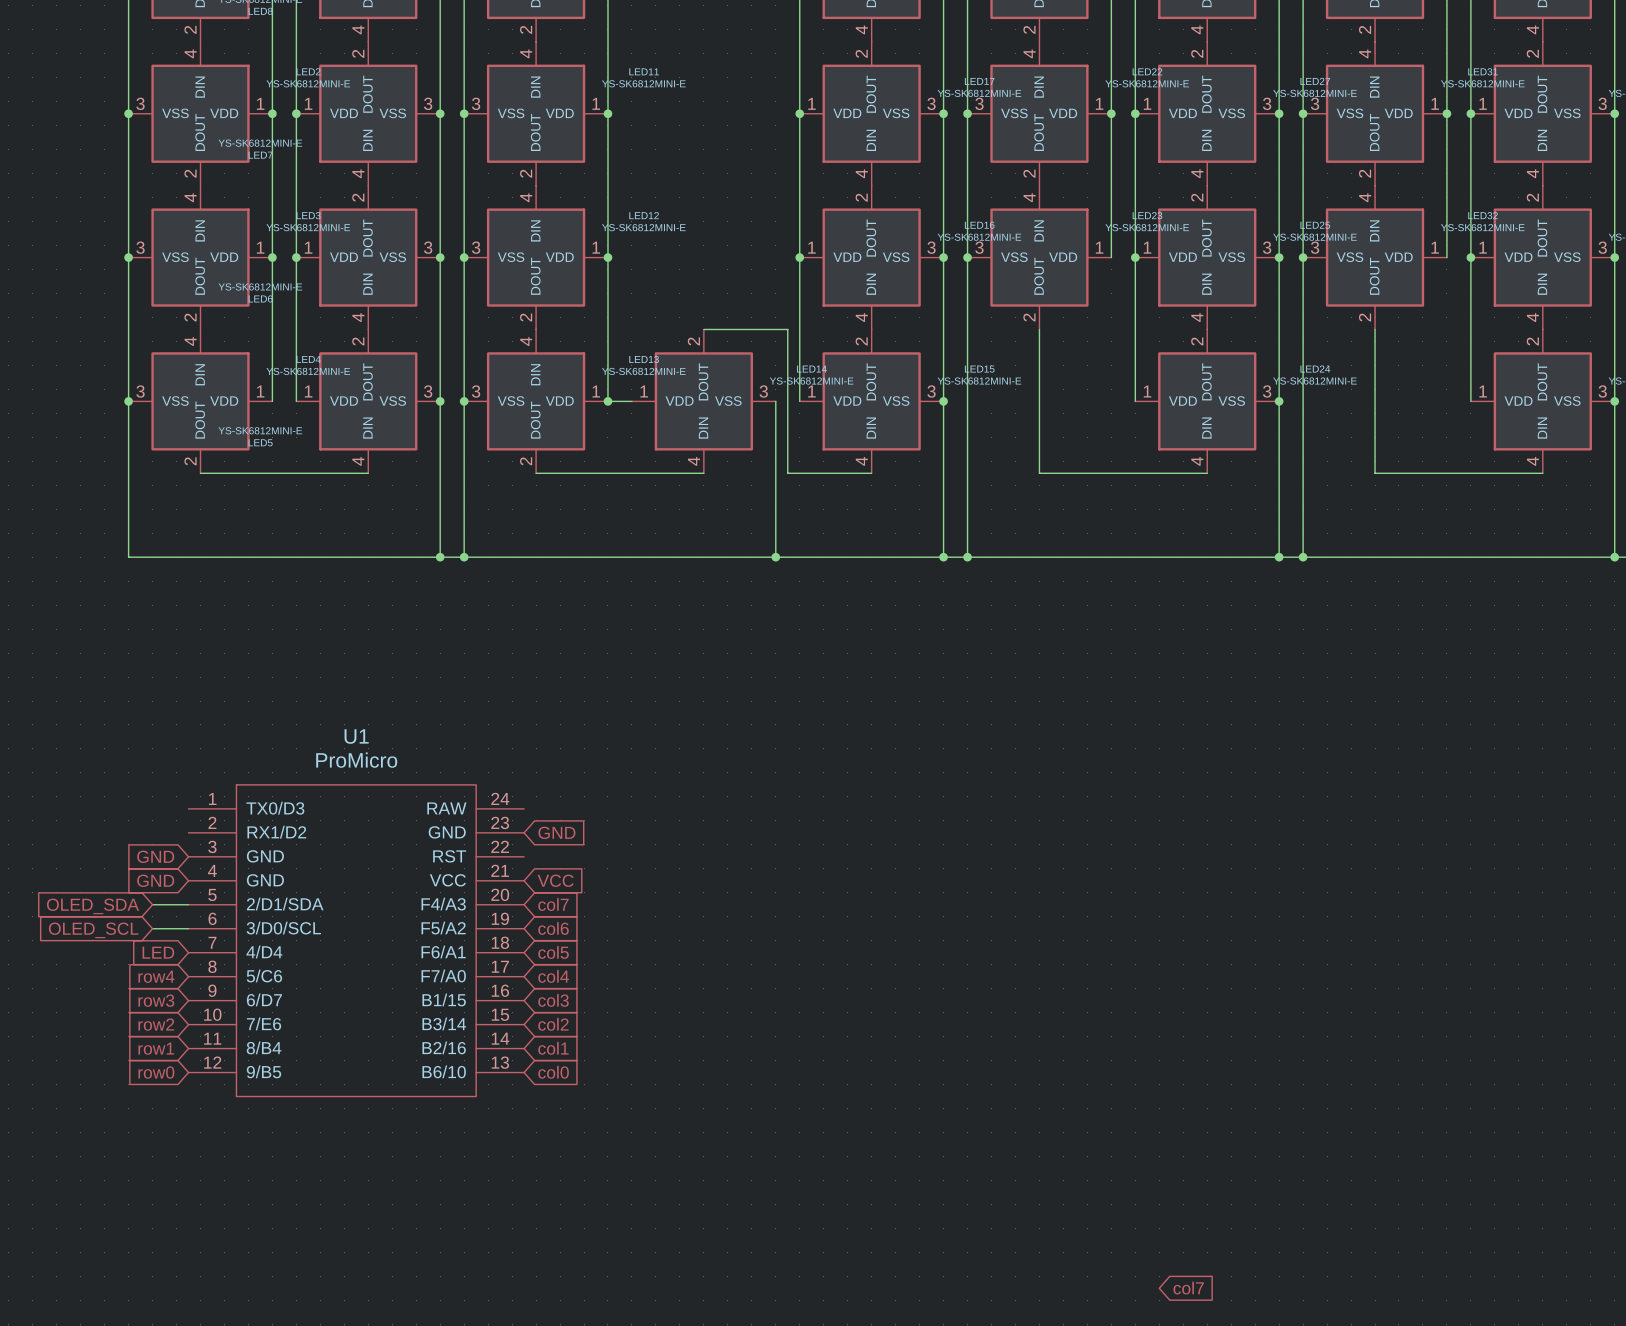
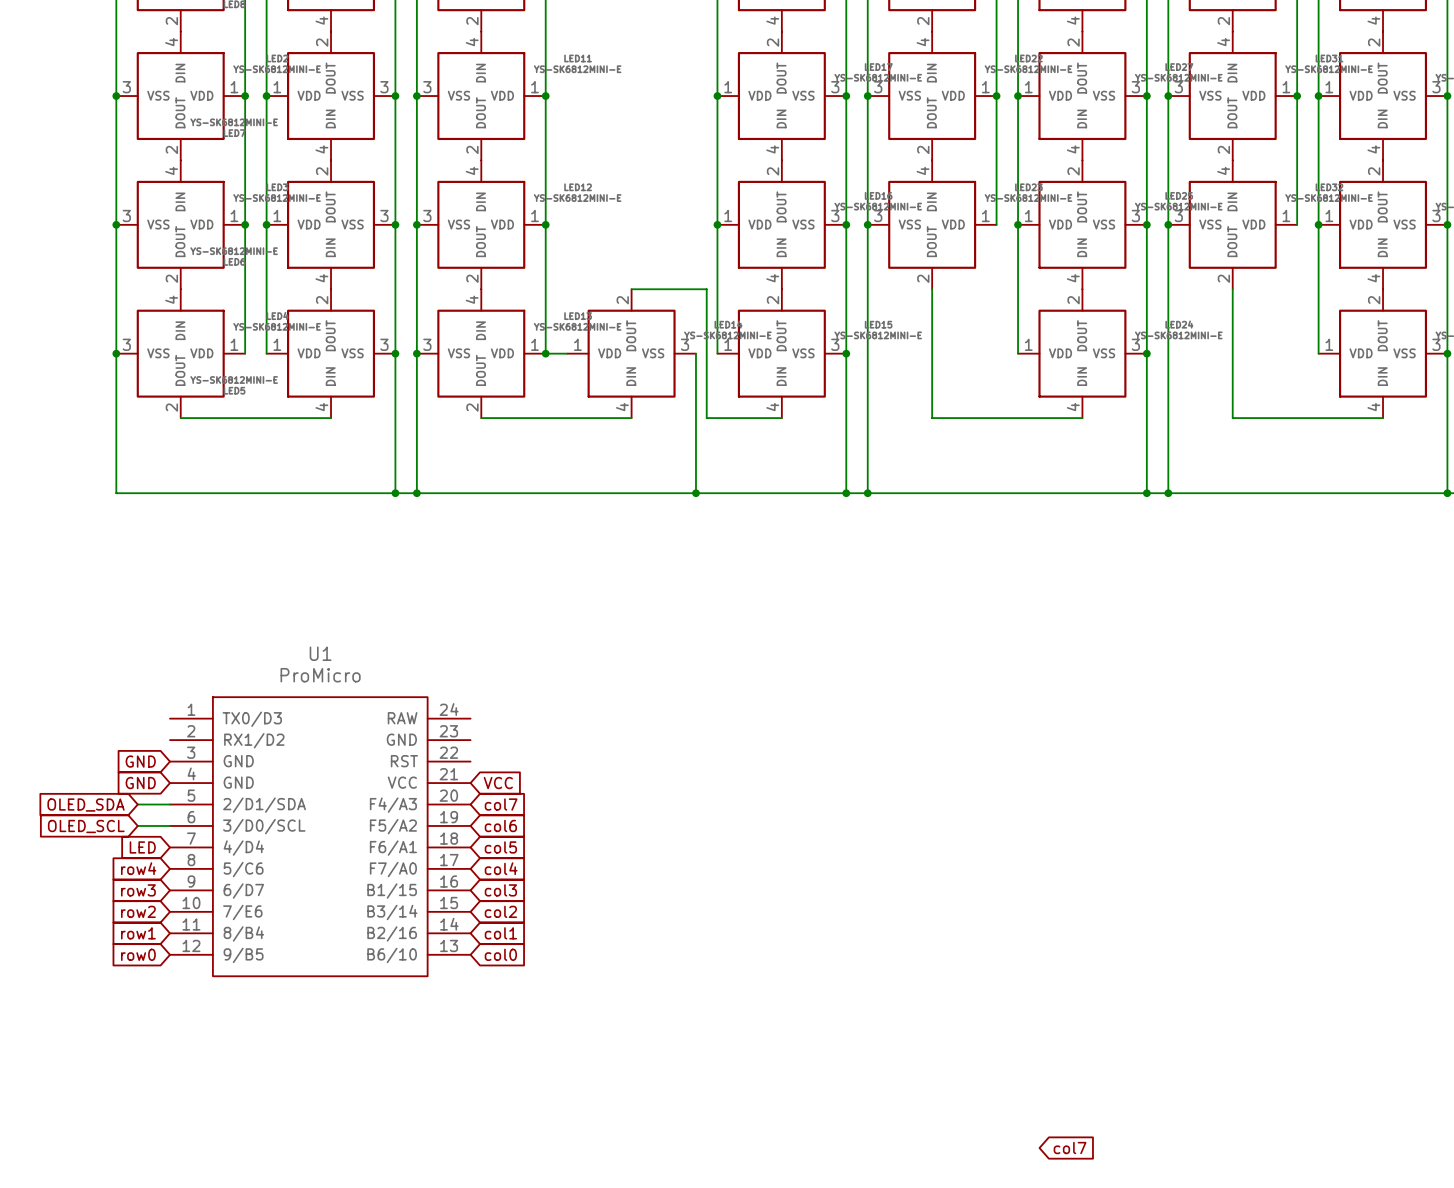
global label: GND (556, 832) -> none

